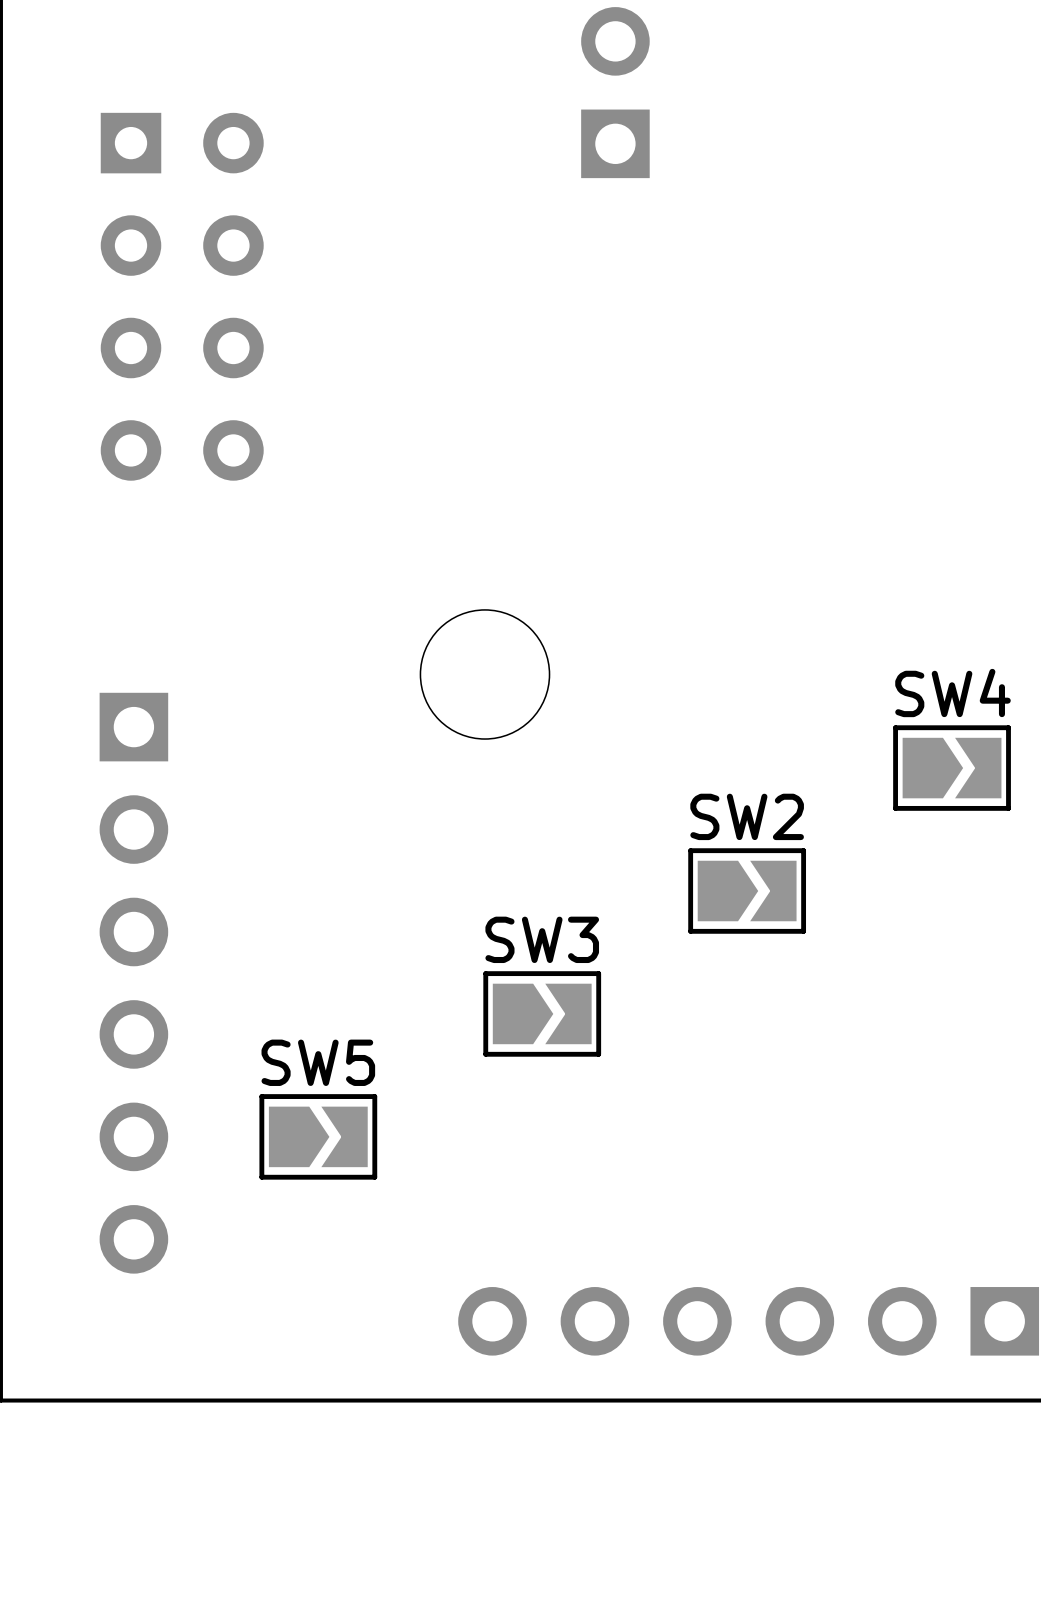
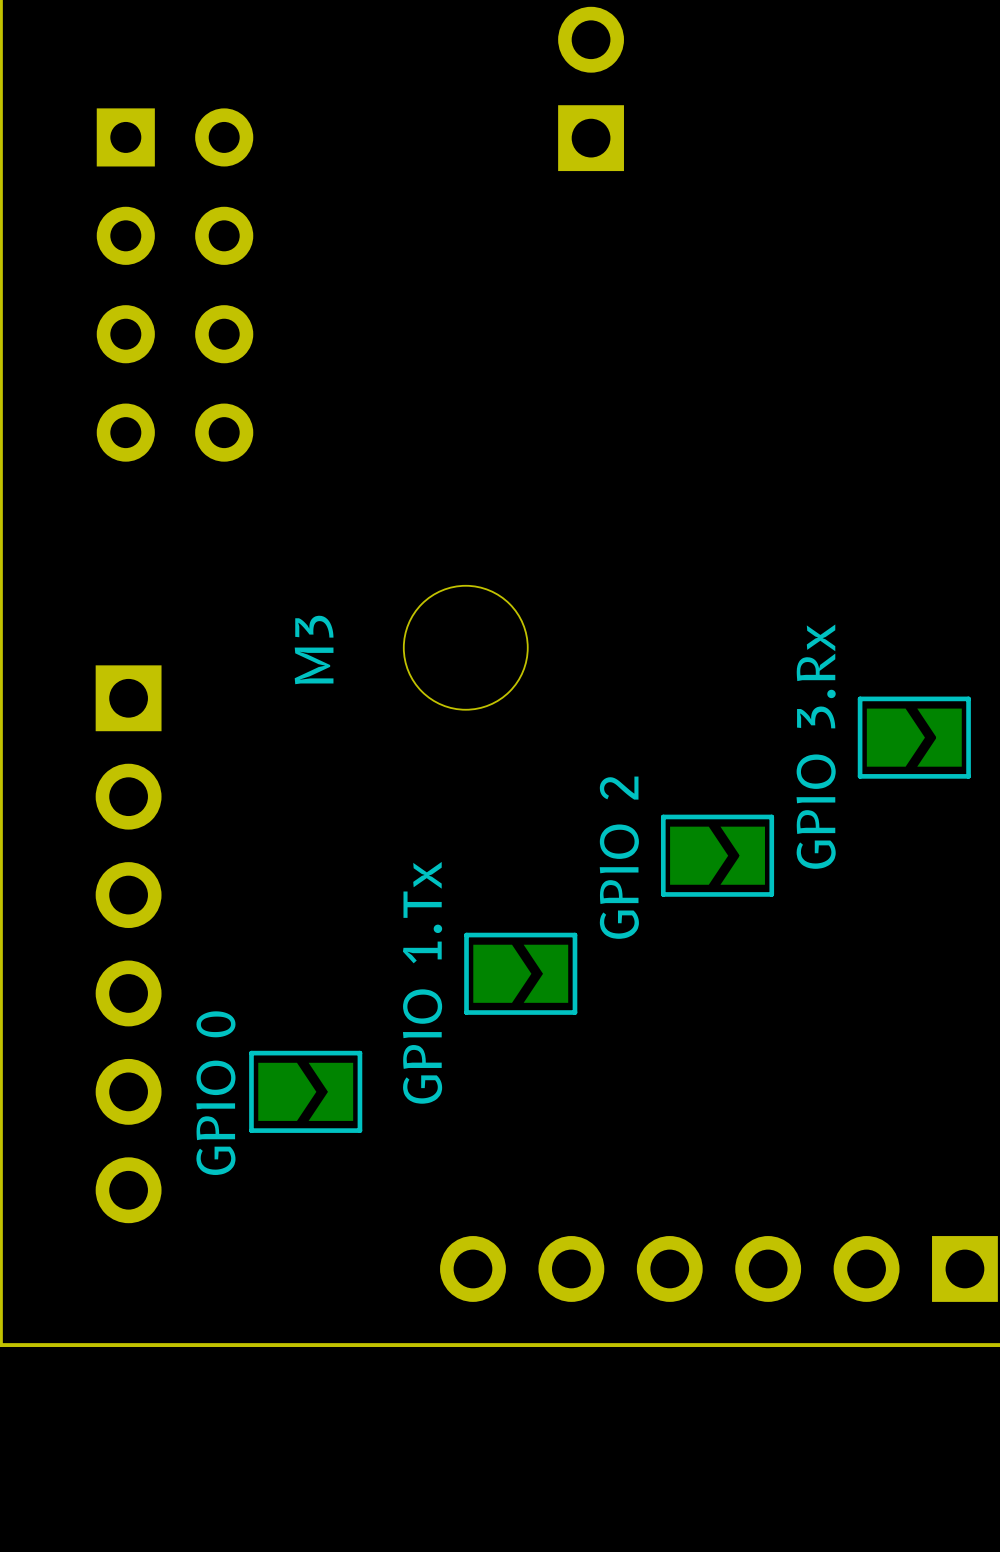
text: none -> M3 (314, 649)
SW4 name: SW4 (952, 692) -> none
text: none -> GPIO 3.Rx (816, 746)
SW2 name: SW2 (747, 816) -> none
text: none -> GPIO 2 (619, 857)
SW3 name: SW3 (542, 939) -> none
text: none -> GPIO 1.Tx (422, 982)
SW5 name: SW5 (318, 1062) -> none
text: none -> GPIO 0 (215, 1093)

